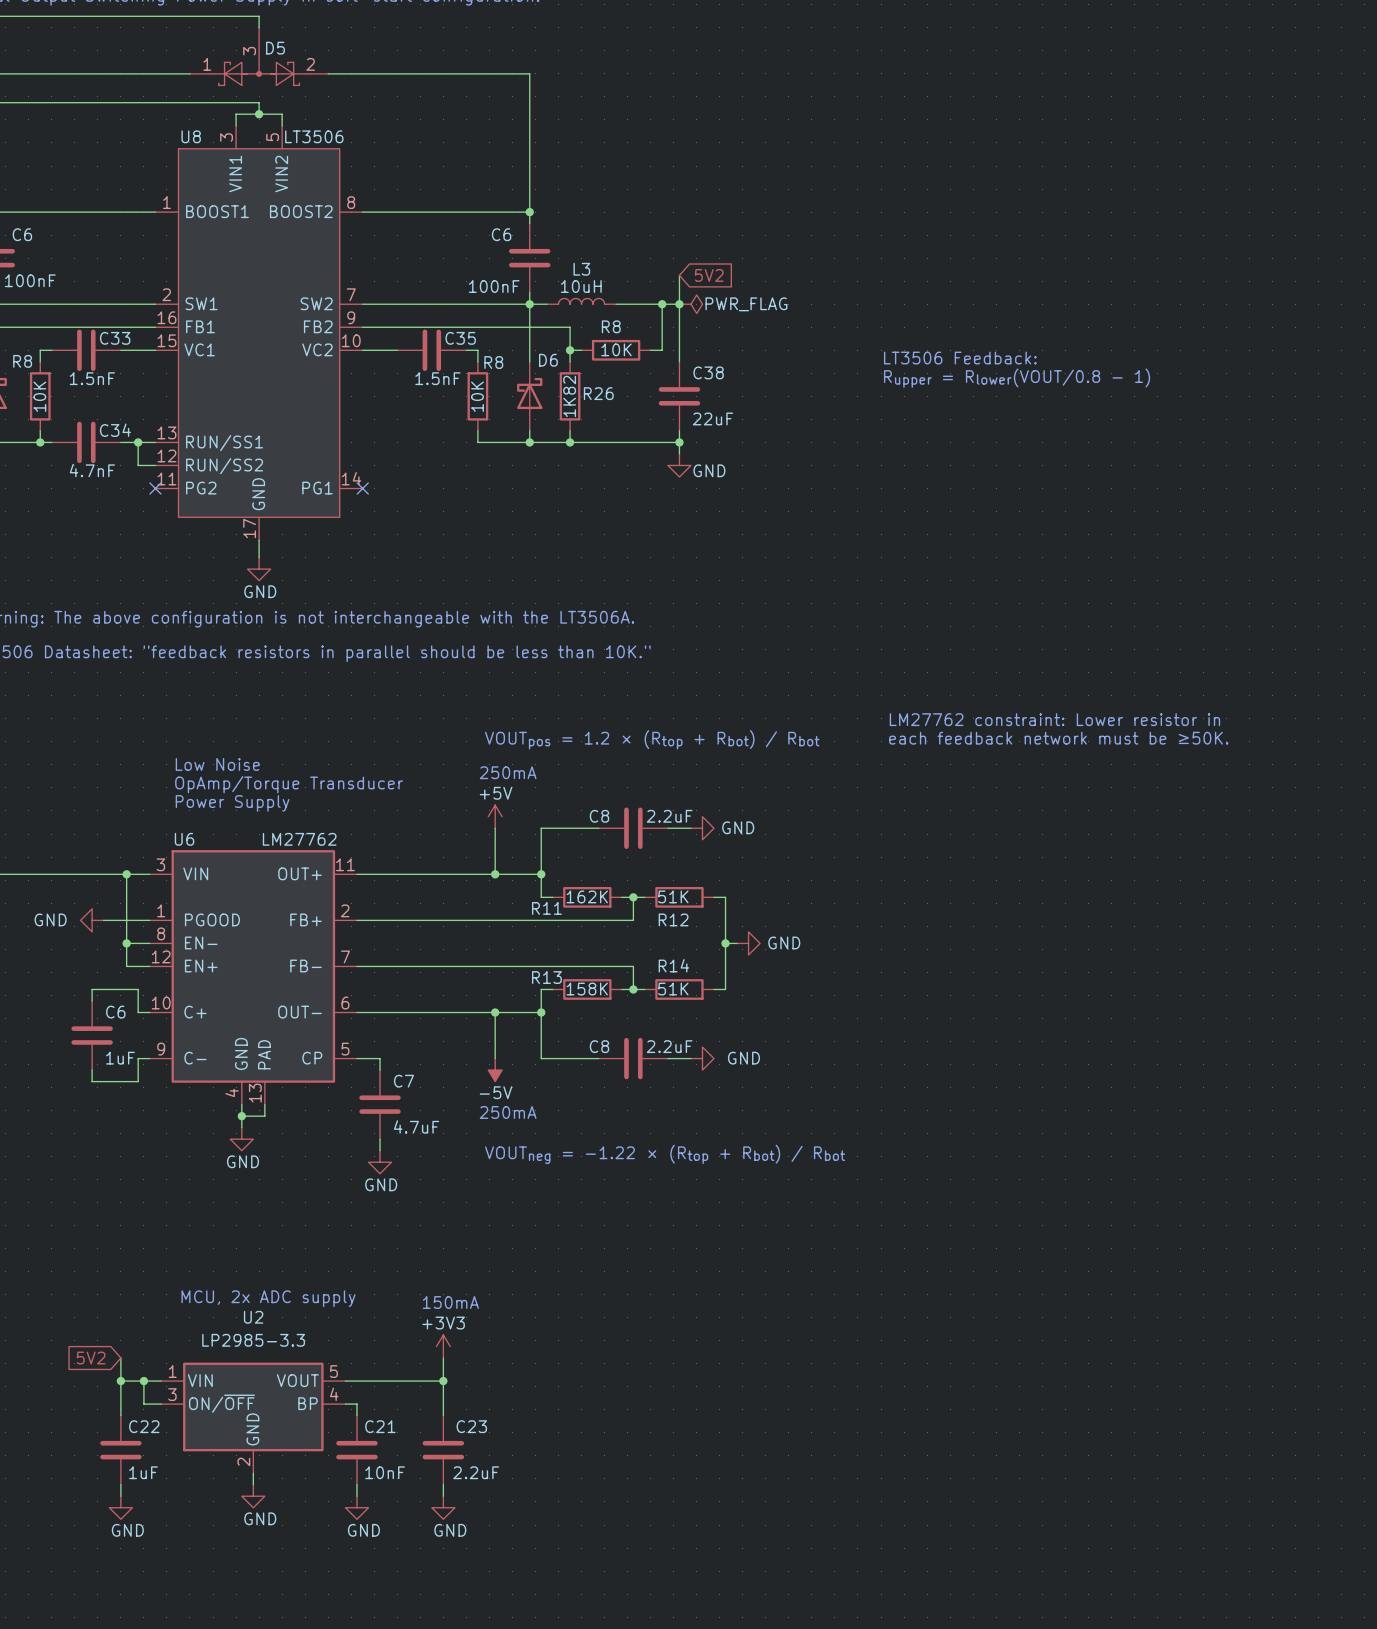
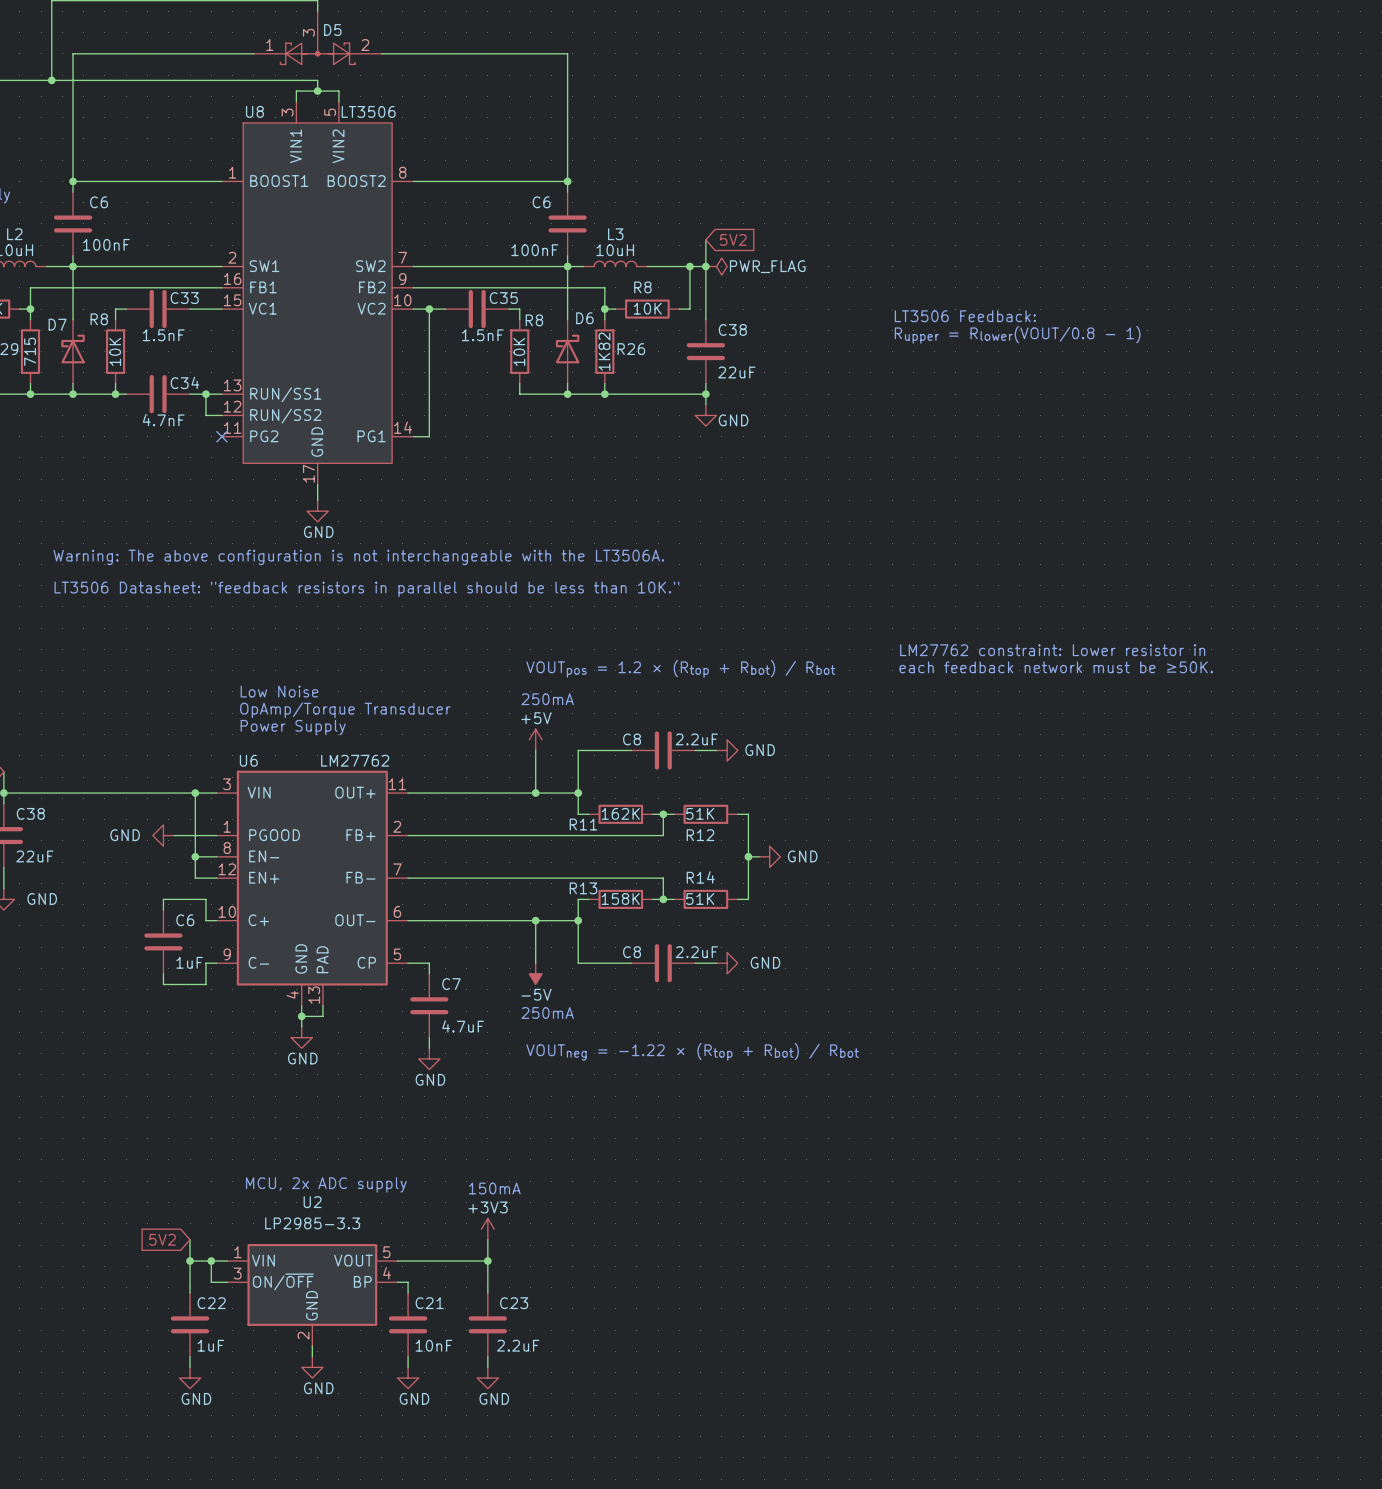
wire: none -> (429, 309) (429, 436) (413, 436)
junction: none -> (429, 309)
no-connect mark: (362, 488) -> none

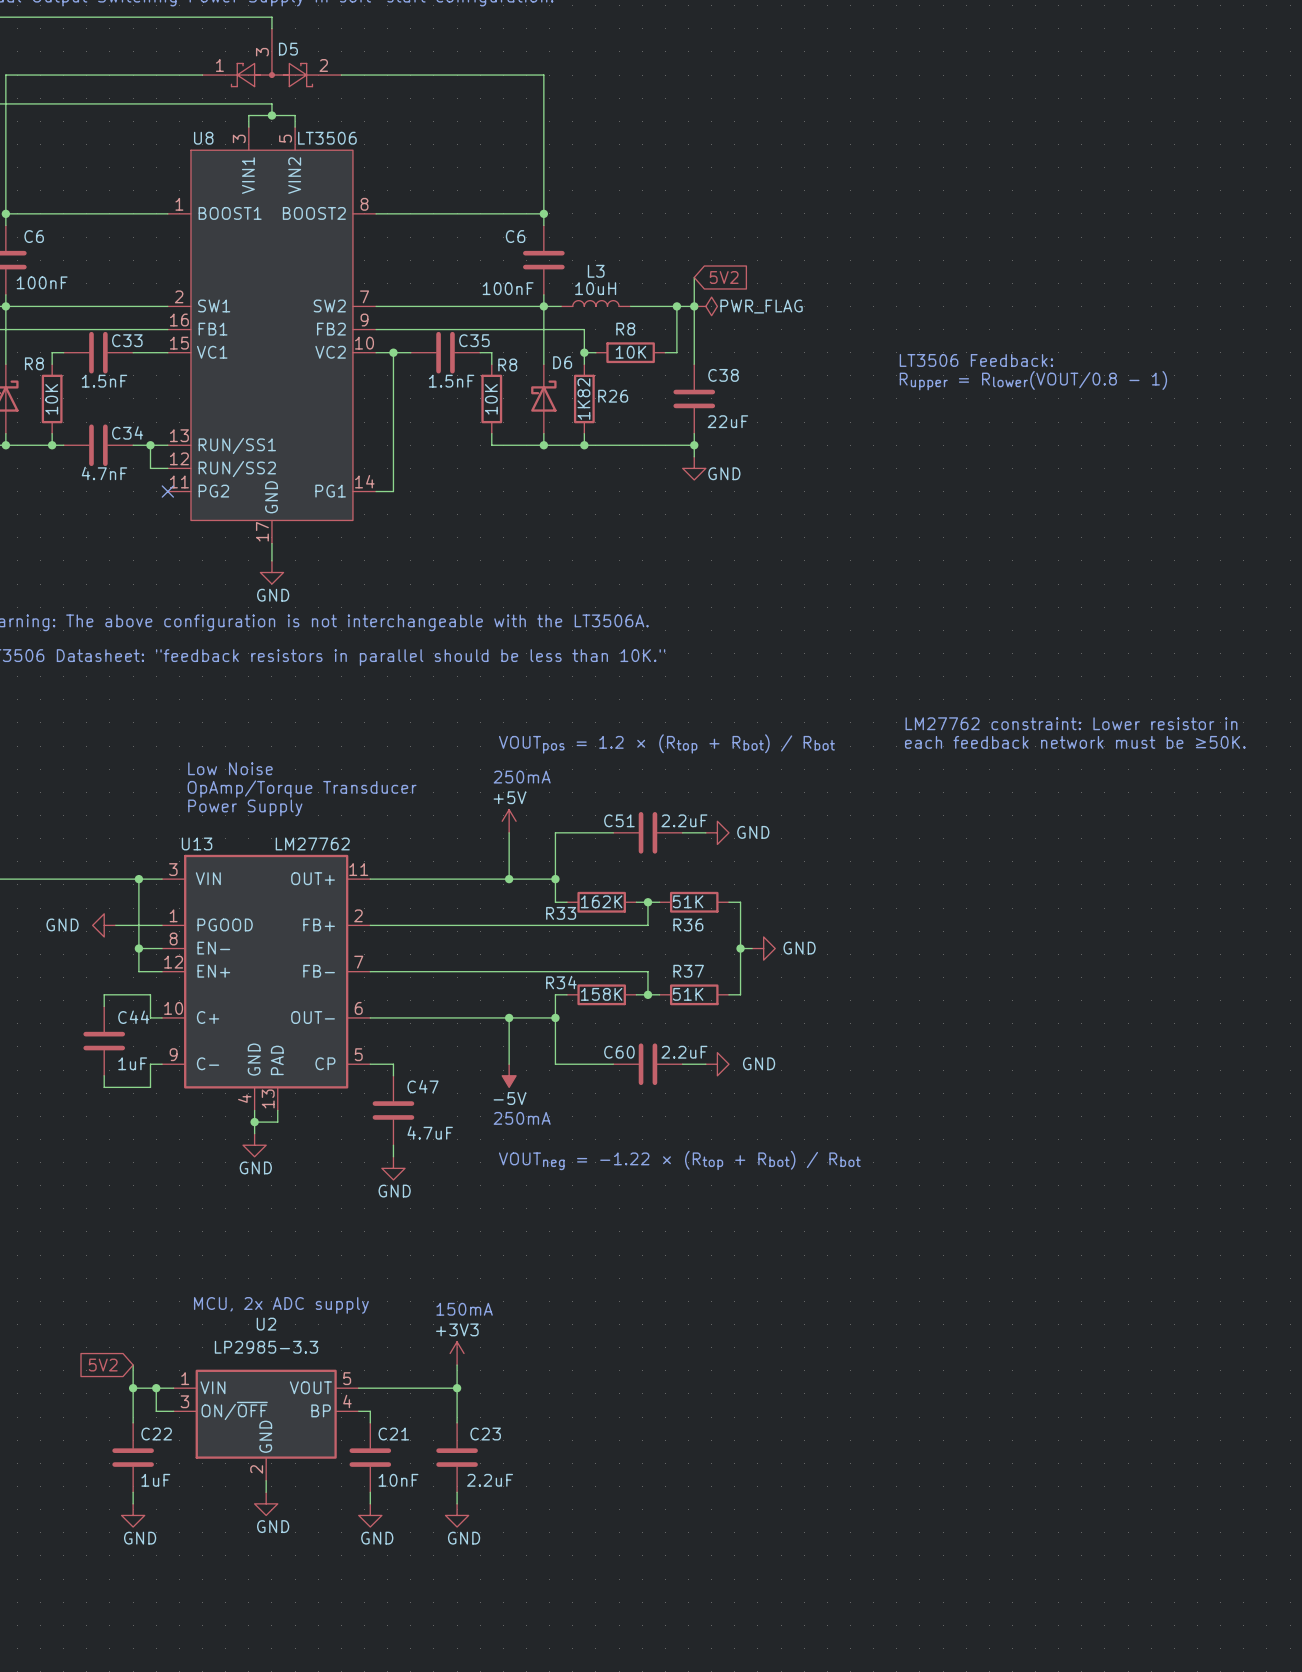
C8 name: C8 (632, 739) -> C51 (619, 820)
U6 name: U6 (248, 760) -> U13 (197, 843)
R11 name: R11 (583, 824) -> R33 (561, 913)
R12 name: R12 (700, 835) -> R36 (688, 924)
R14 name: R14 (700, 877) -> R37 (688, 971)
R13 name: R13 (583, 888) -> R34 (561, 982)
C6 name: C6 (185, 920) -> C44 (133, 1017)
C8 name: C8 (632, 952) -> C60 (619, 1052)
C7 name: C7 (451, 984) -> C47 (423, 1086)

